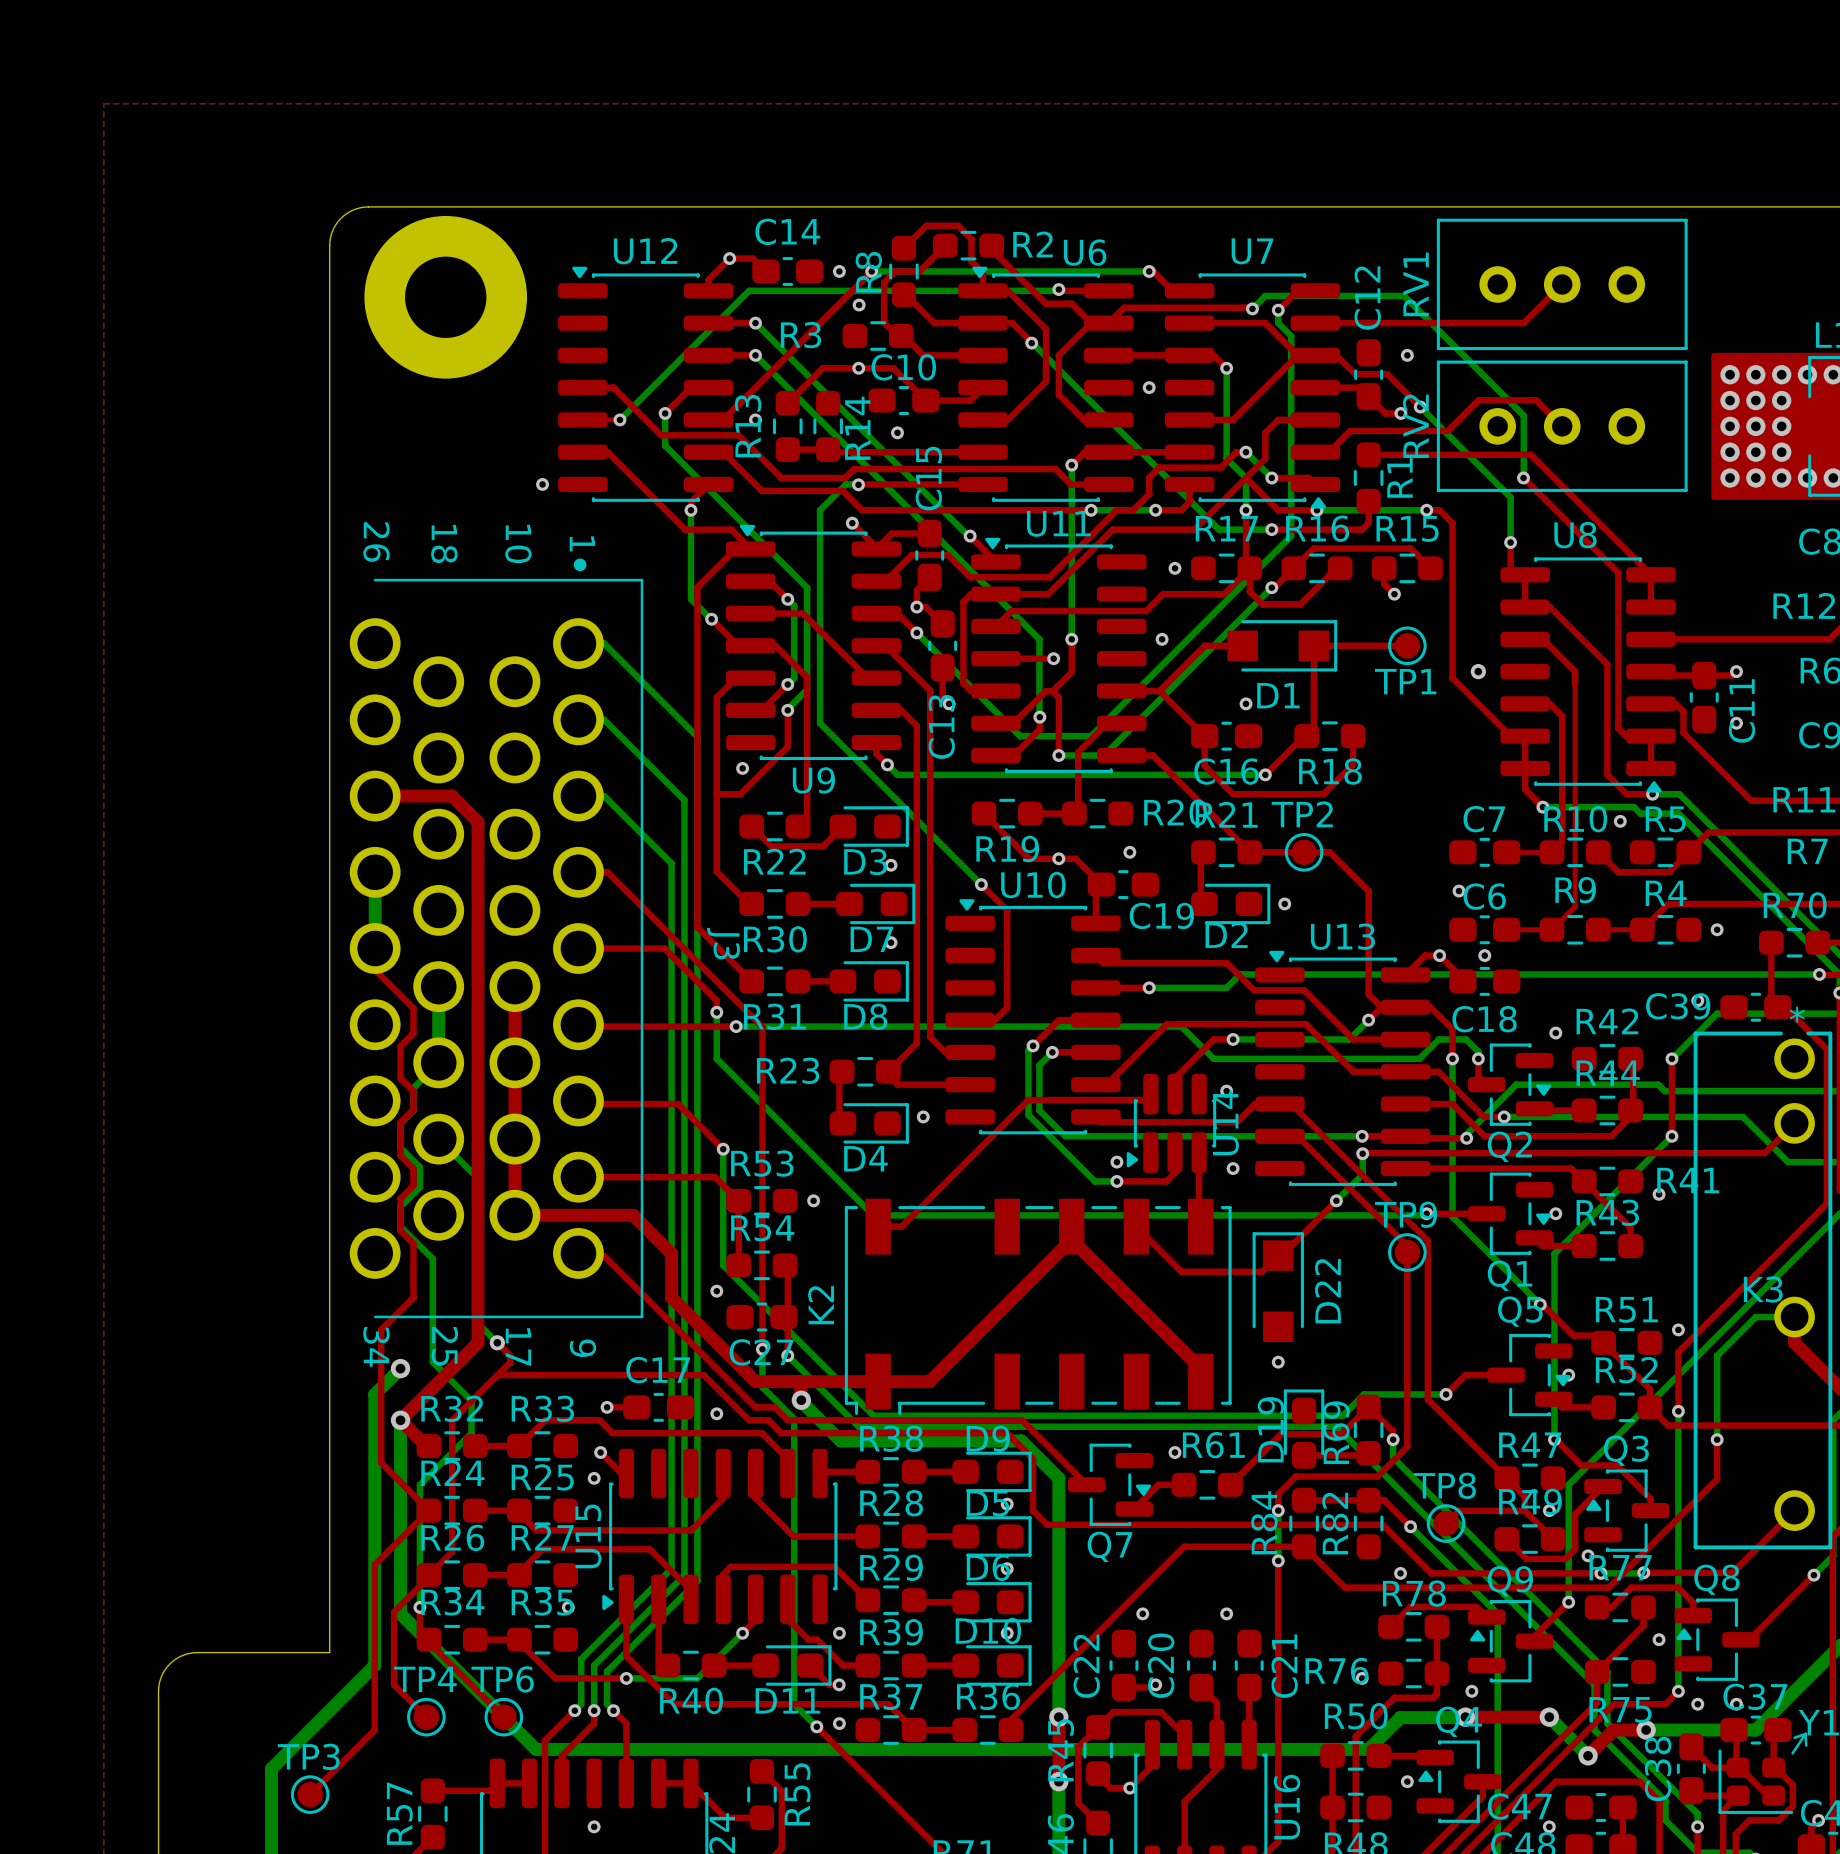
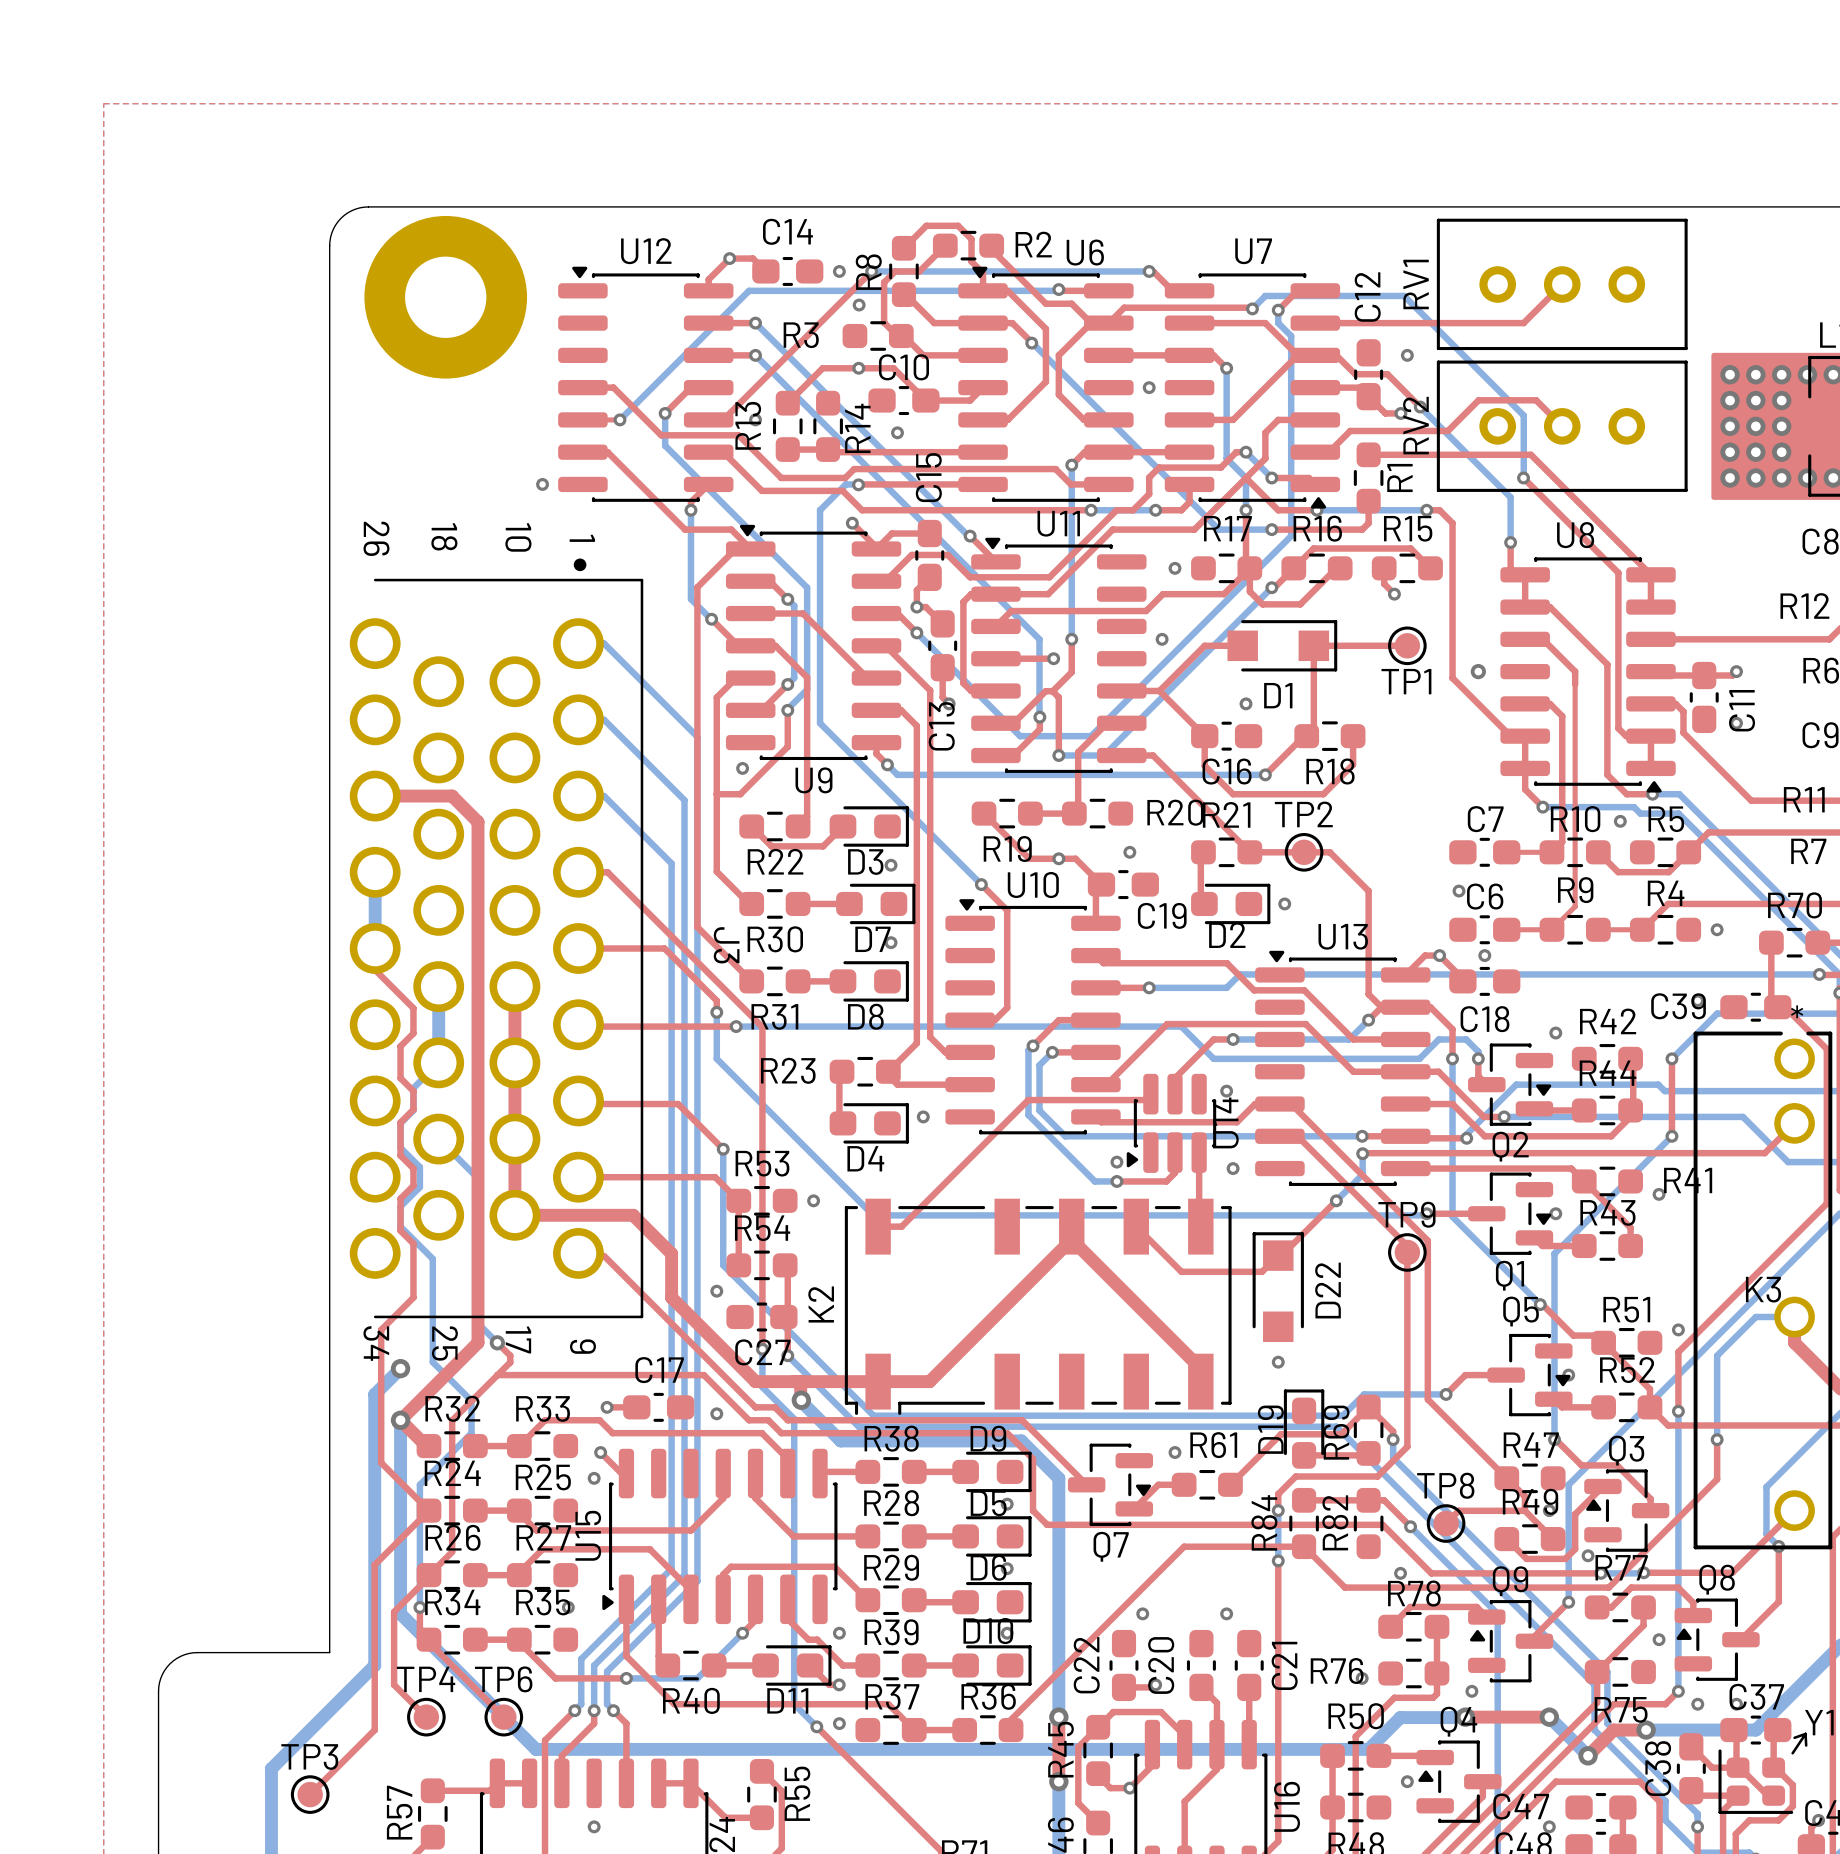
bottom track: (1833, 1420) (1833, 1555) (1813, 1575) -> (1833, 1420) (1766, 1487) (1766, 1534) (1778, 1546)
top track: (1813, 1575) (1749, 1639) (1740, 1639) -> (1778, 1546) (1778, 1601) (1740, 1639)
via position: (1813, 1575) -> (1778, 1546)

